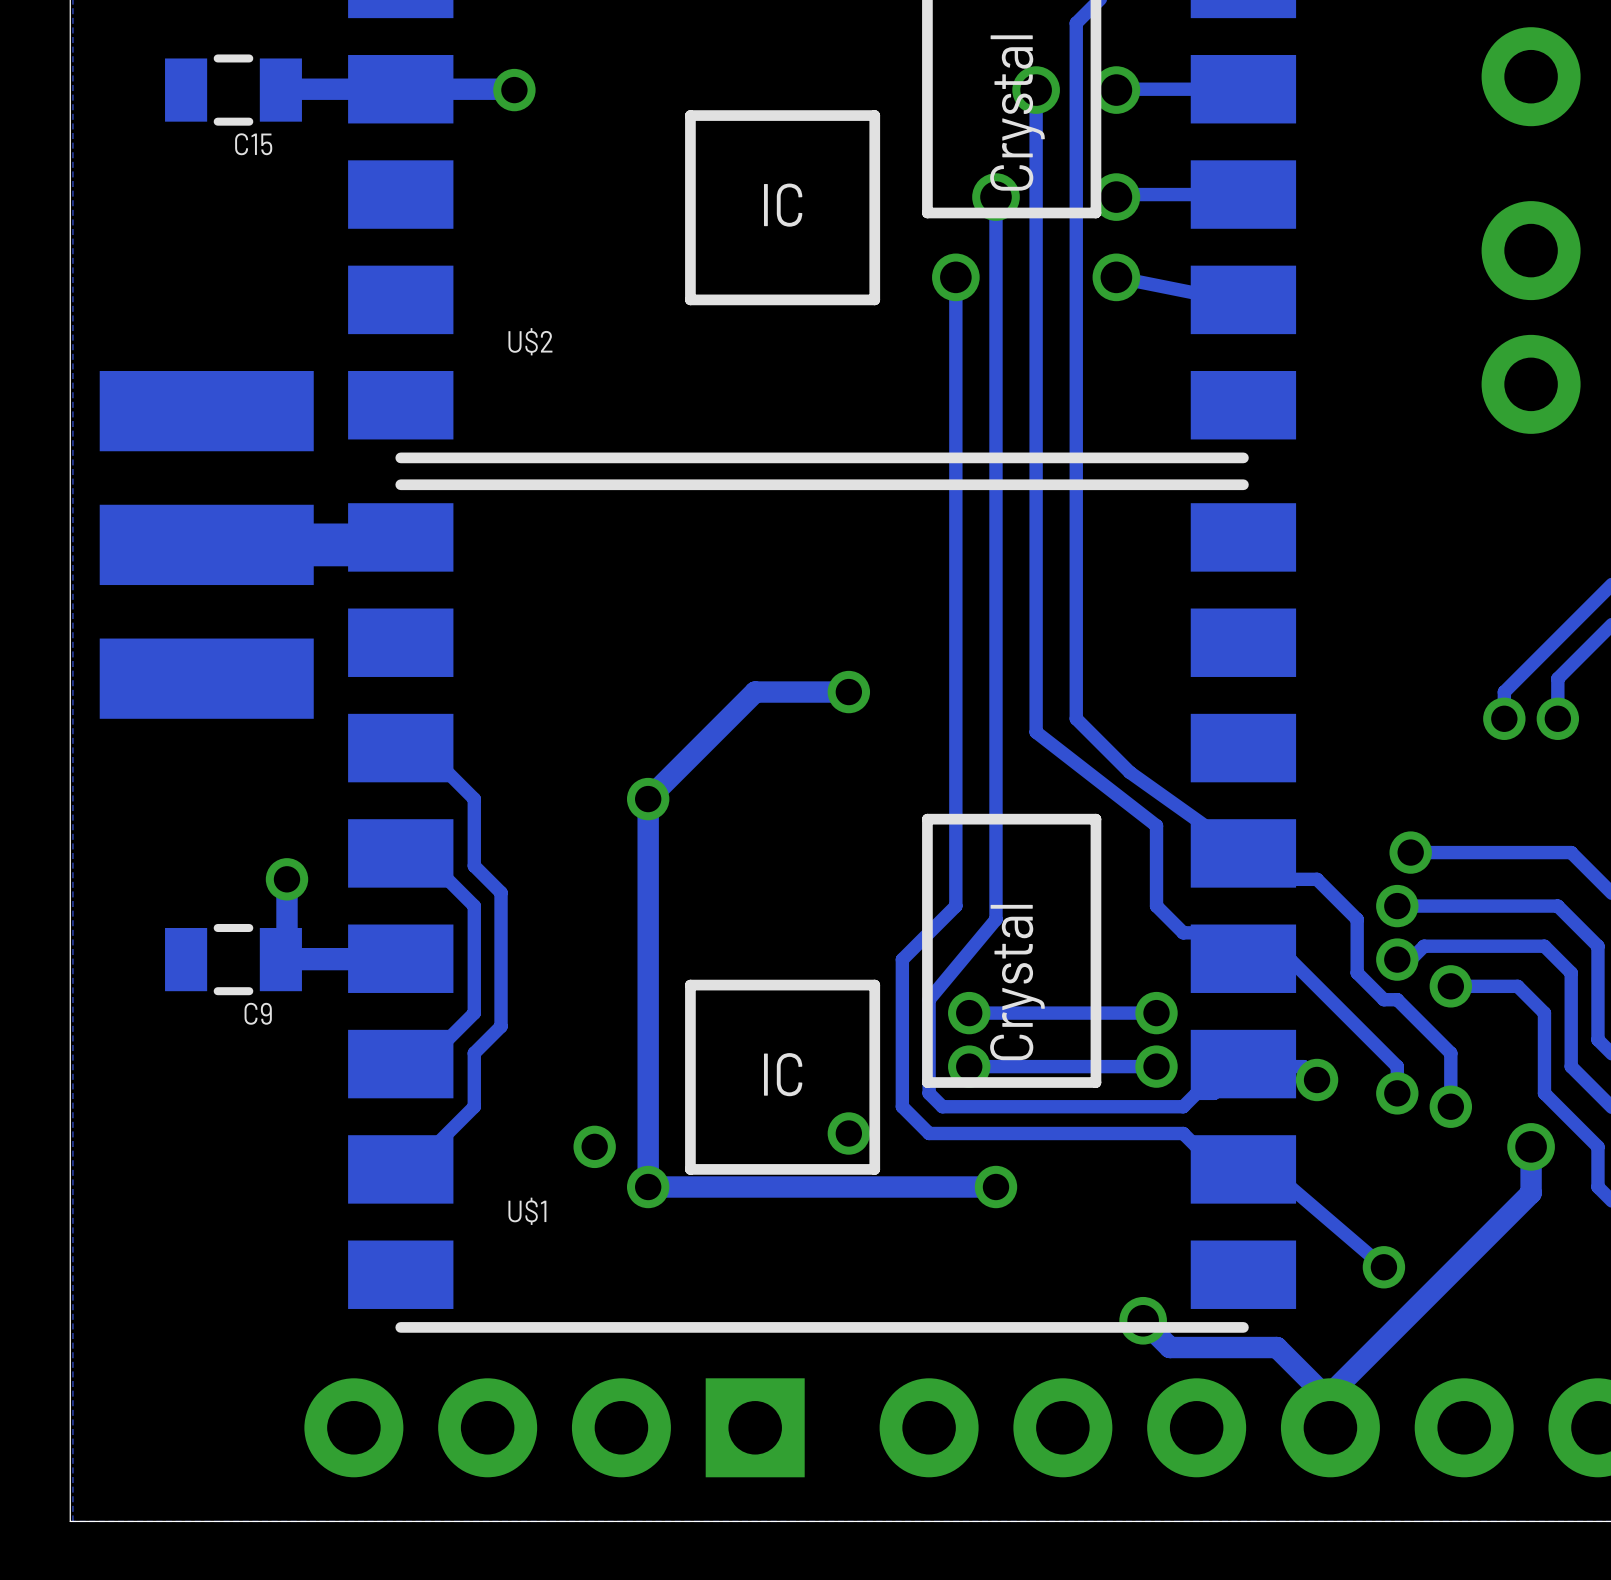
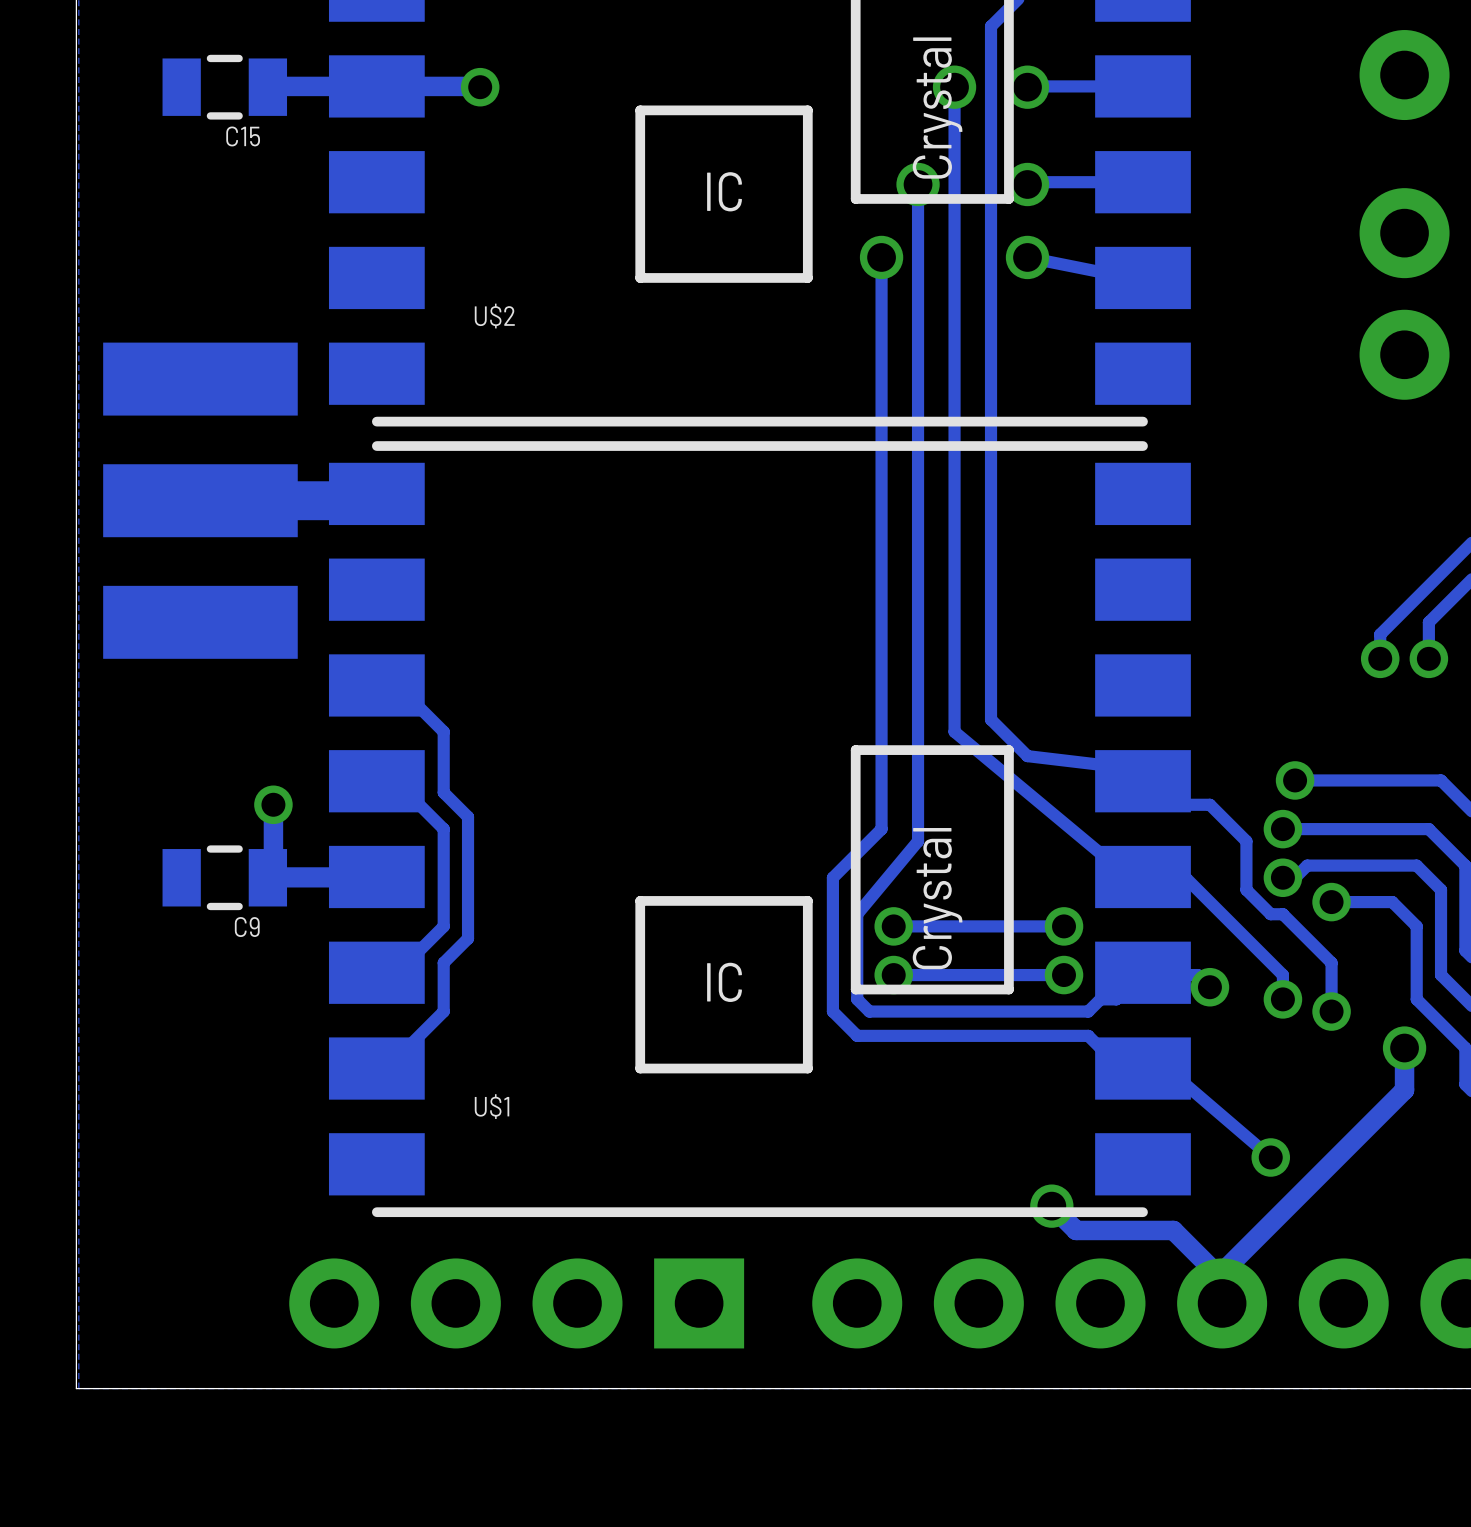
track: (848, 692) (755, 692) (648, 799) (648, 1187) (995, 1187) -> none
via: (848, 692) -> none
track: (1076, 718) (1129, 772) (1242, 852) -> (991, 658) (991, 719) (1027, 756) (1130, 768) (1142, 780)
track: (1036, 732) (1156, 825) (1156, 906) (1183, 932) (1196, 932) -> (954, 670) (954, 731) (1100, 853)
via: (648, 799) -> none
via: (848, 1133) -> none
via: (594, 1146) -> none
via: (648, 1187) -> none
via: (995, 1187) -> none

